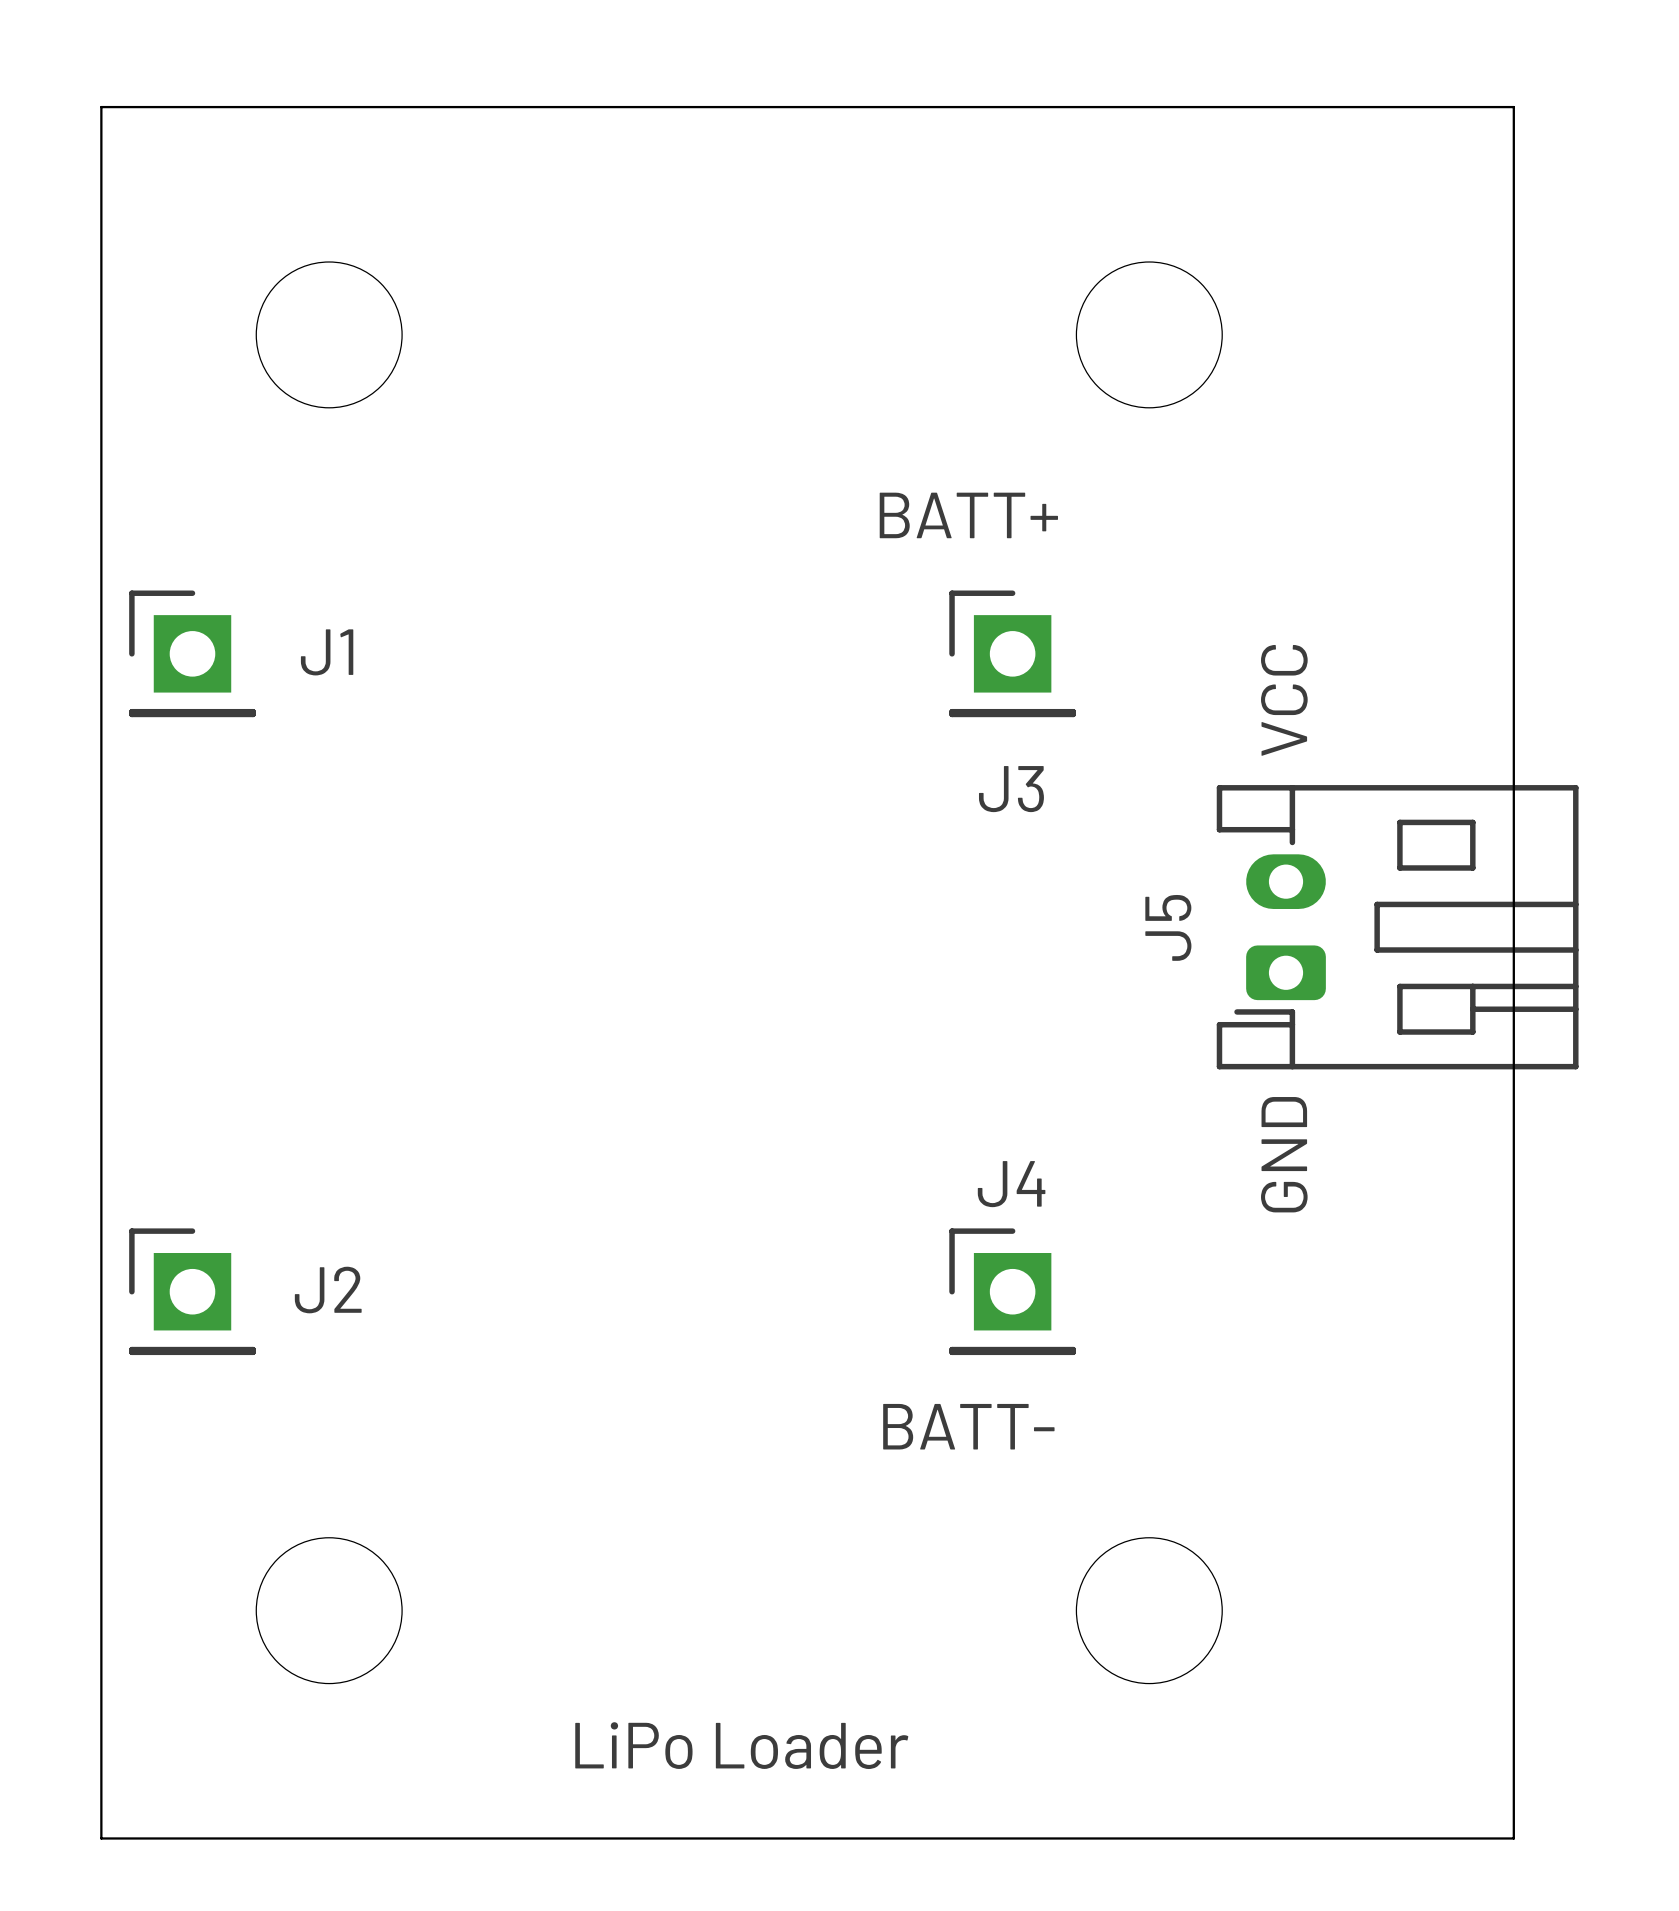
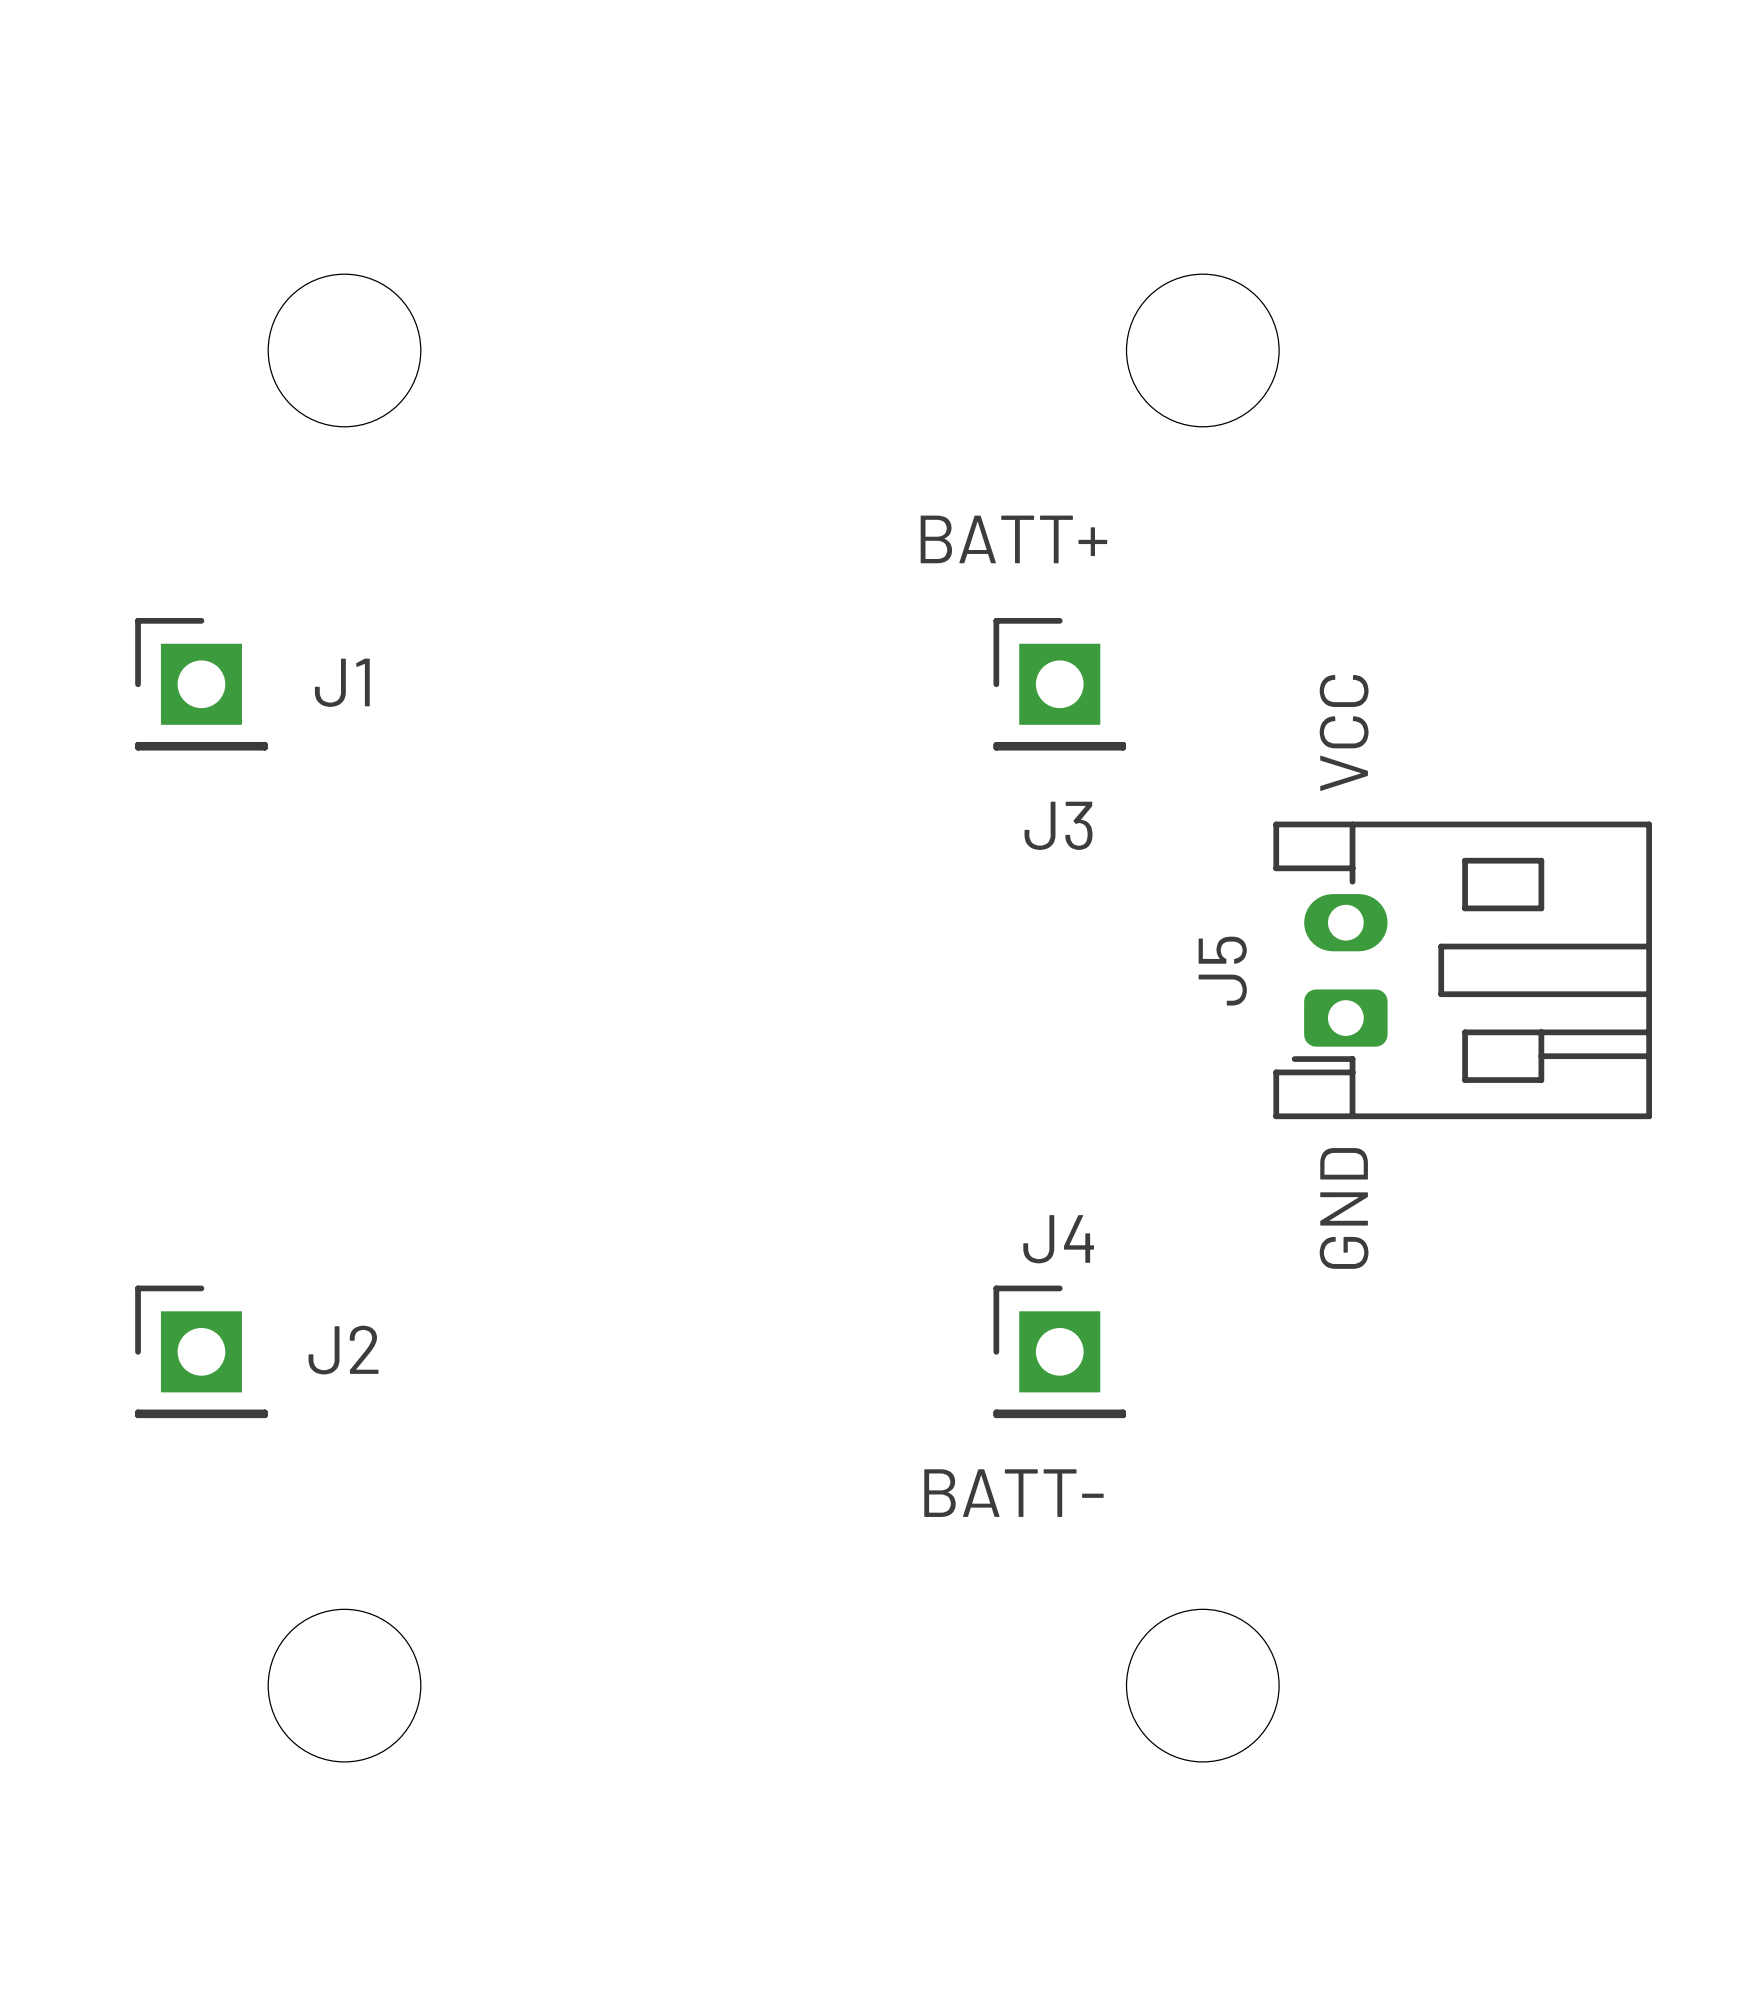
board edge: (101, 107) (1513, 107) (1513, 1838) (101, 1838) (101, 107) -> none
text: LiPo Loader (741, 1745) -> none

